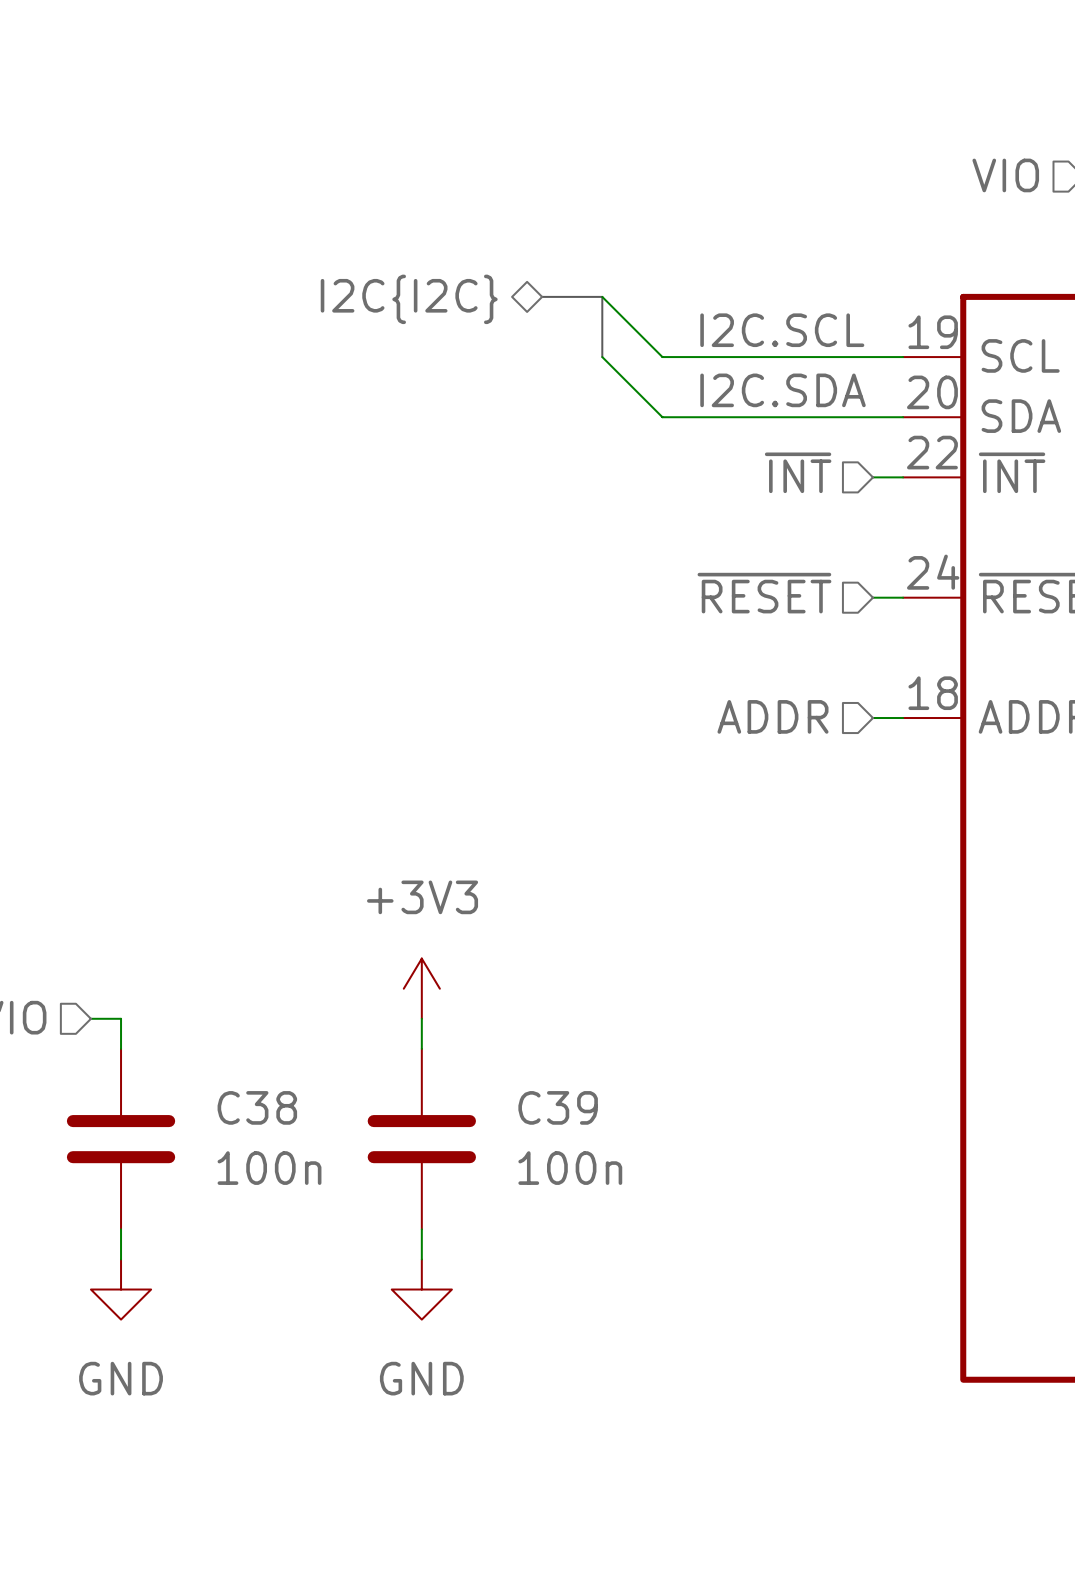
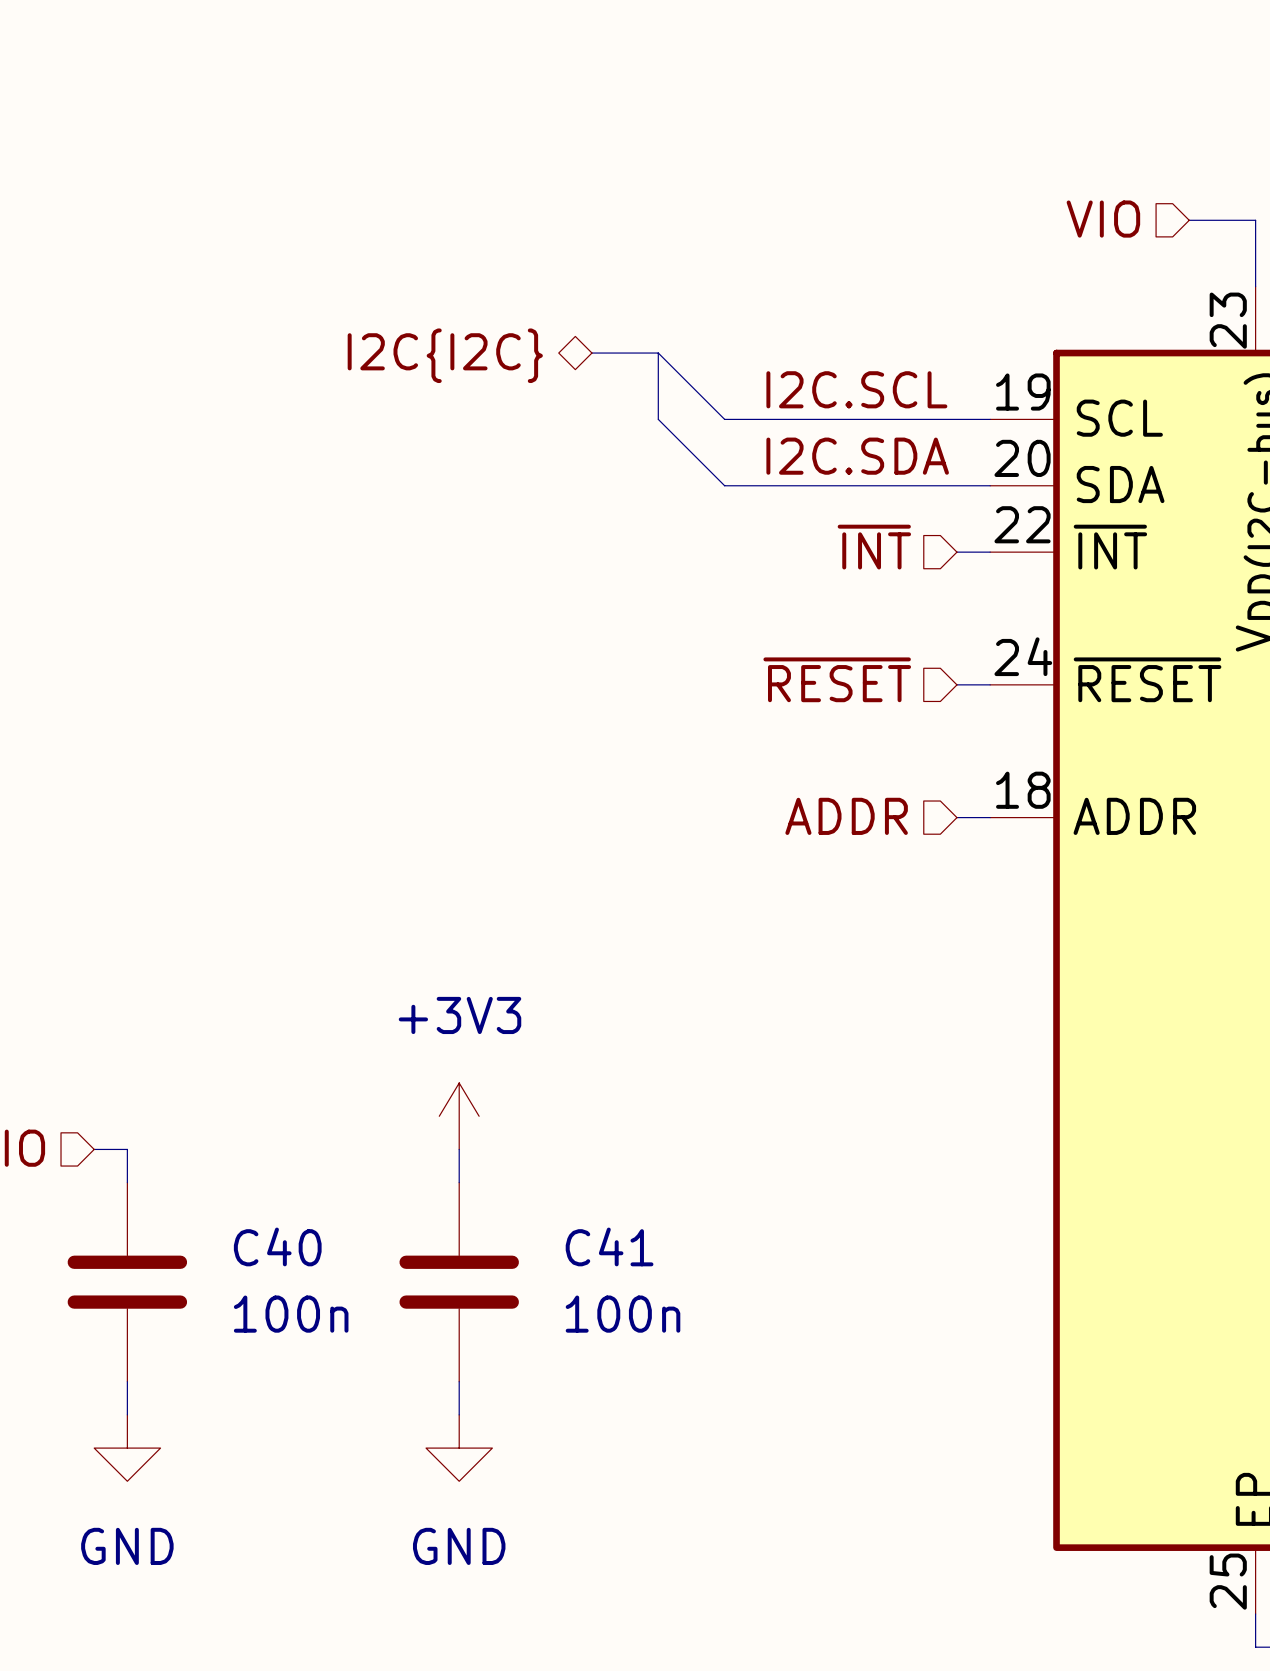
C38 name: C38 (257, 1107) -> C40 (277, 1246)
C39 name: C39 (558, 1107) -> C41 (609, 1246)

